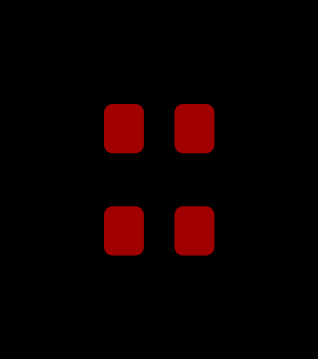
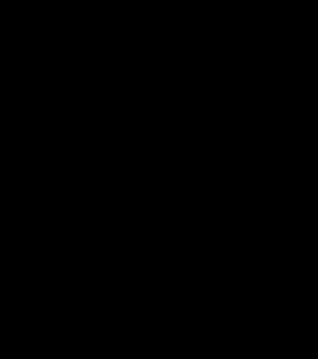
part: (159, 128) -> none
part: (159, 230) -> none

